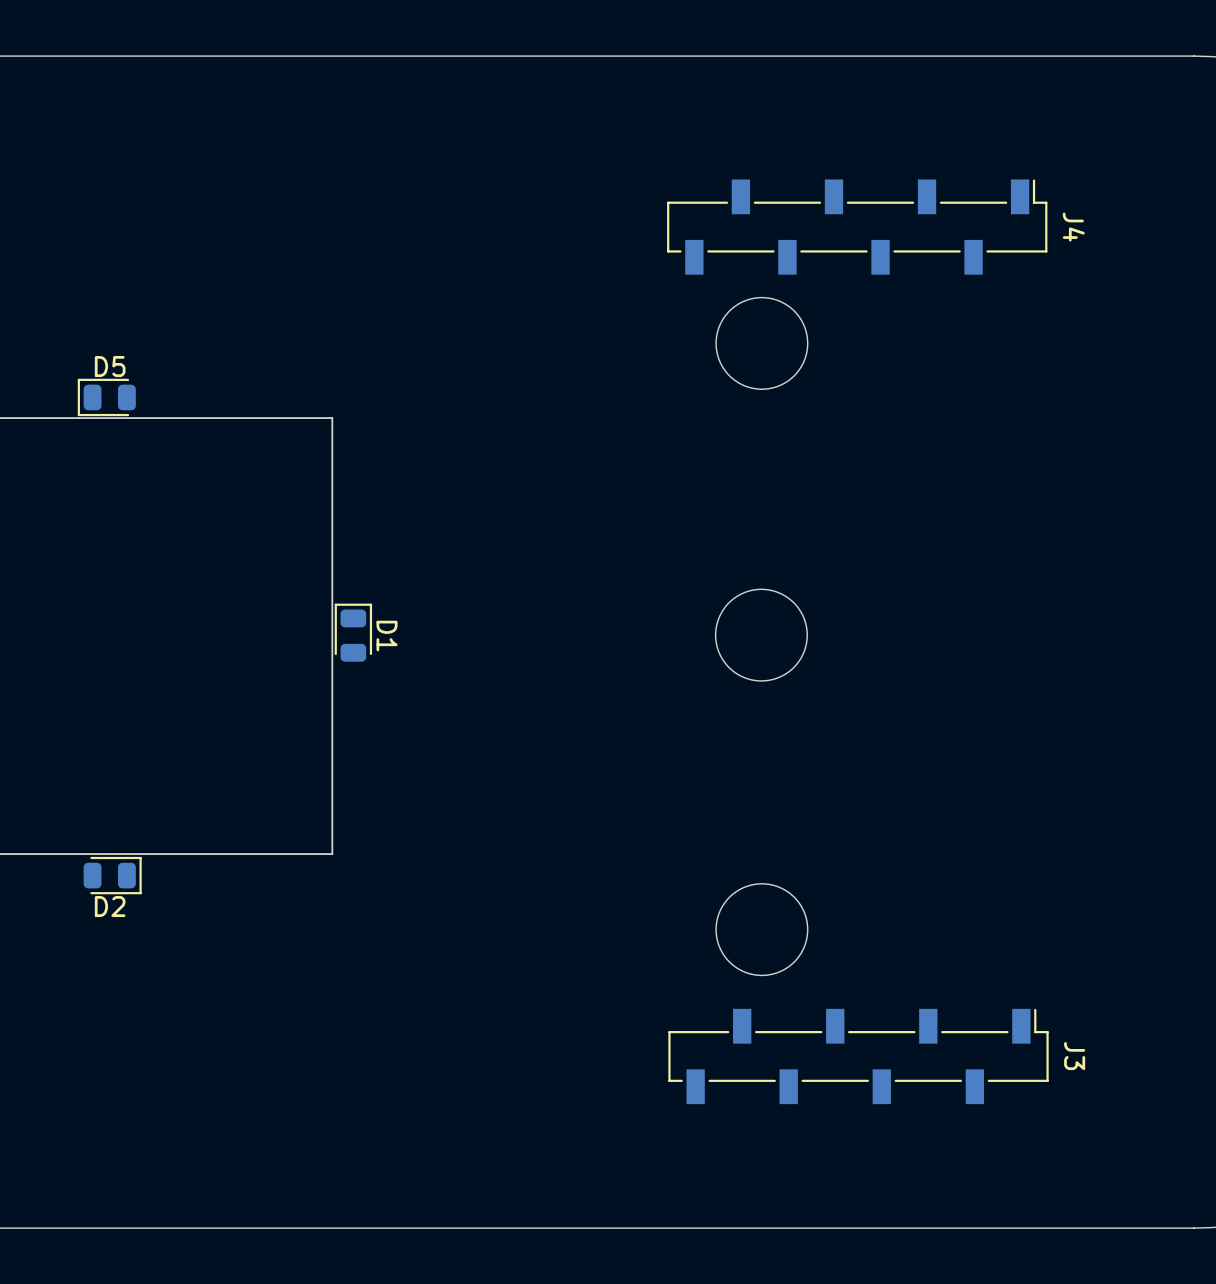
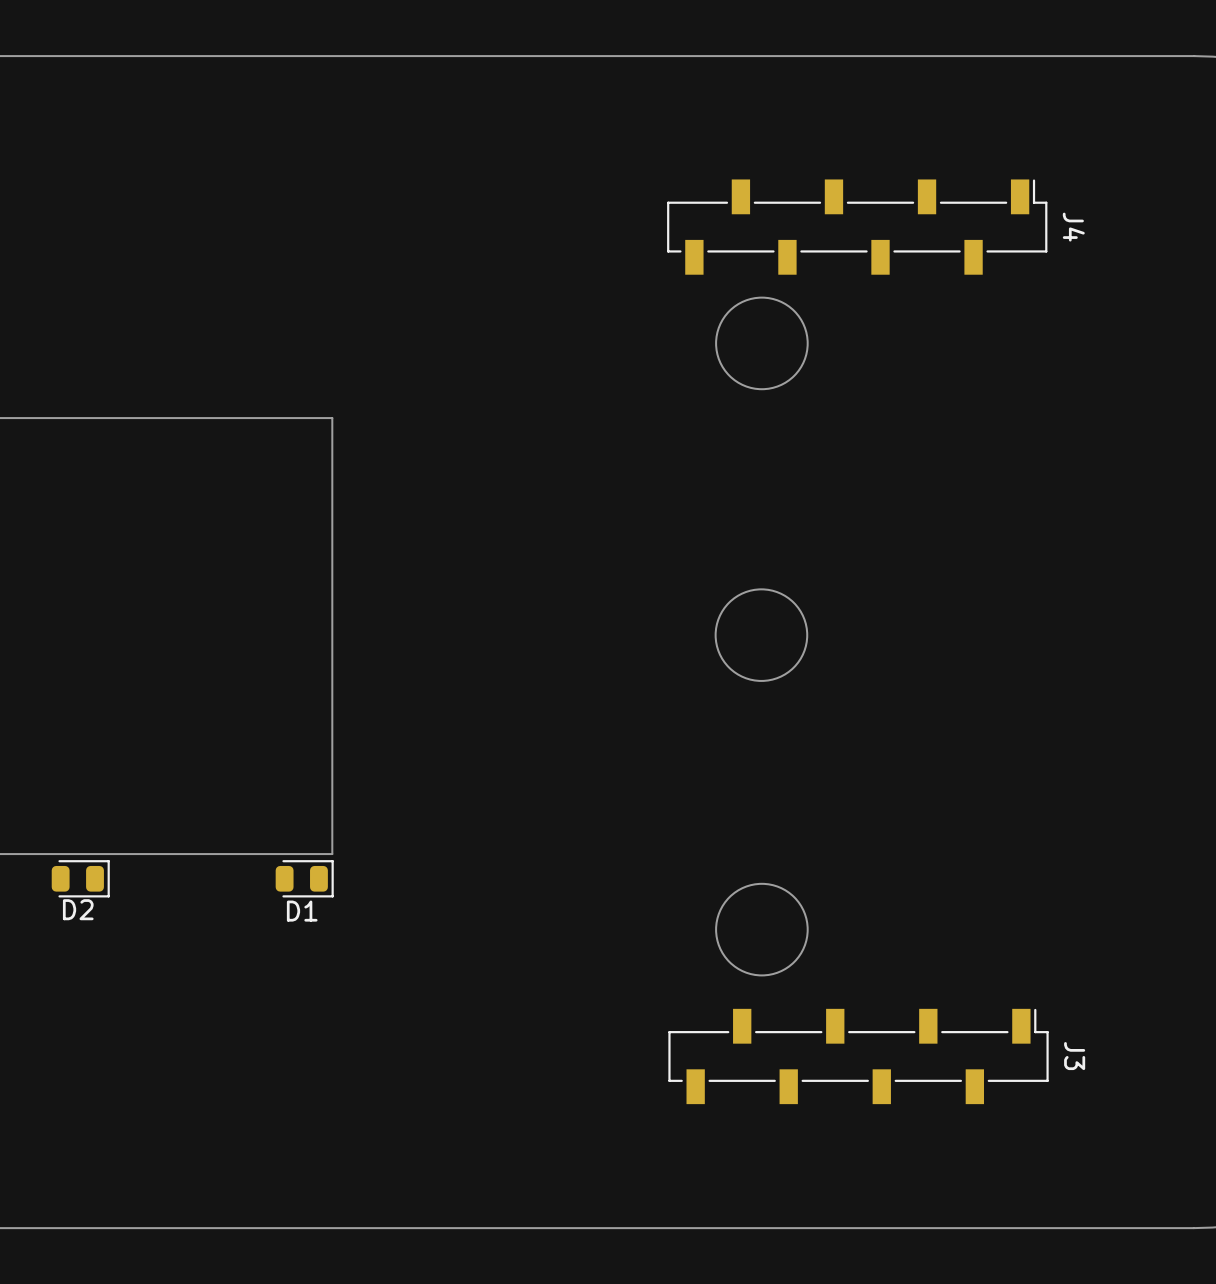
D5: (106, 397) -> none
D1 rotation: 0° (353, 632) -> 90° clockwise (304, 878)
D1 position: (353, 632) -> (304, 878)
D2 position: (112, 875) -> (80, 878)

